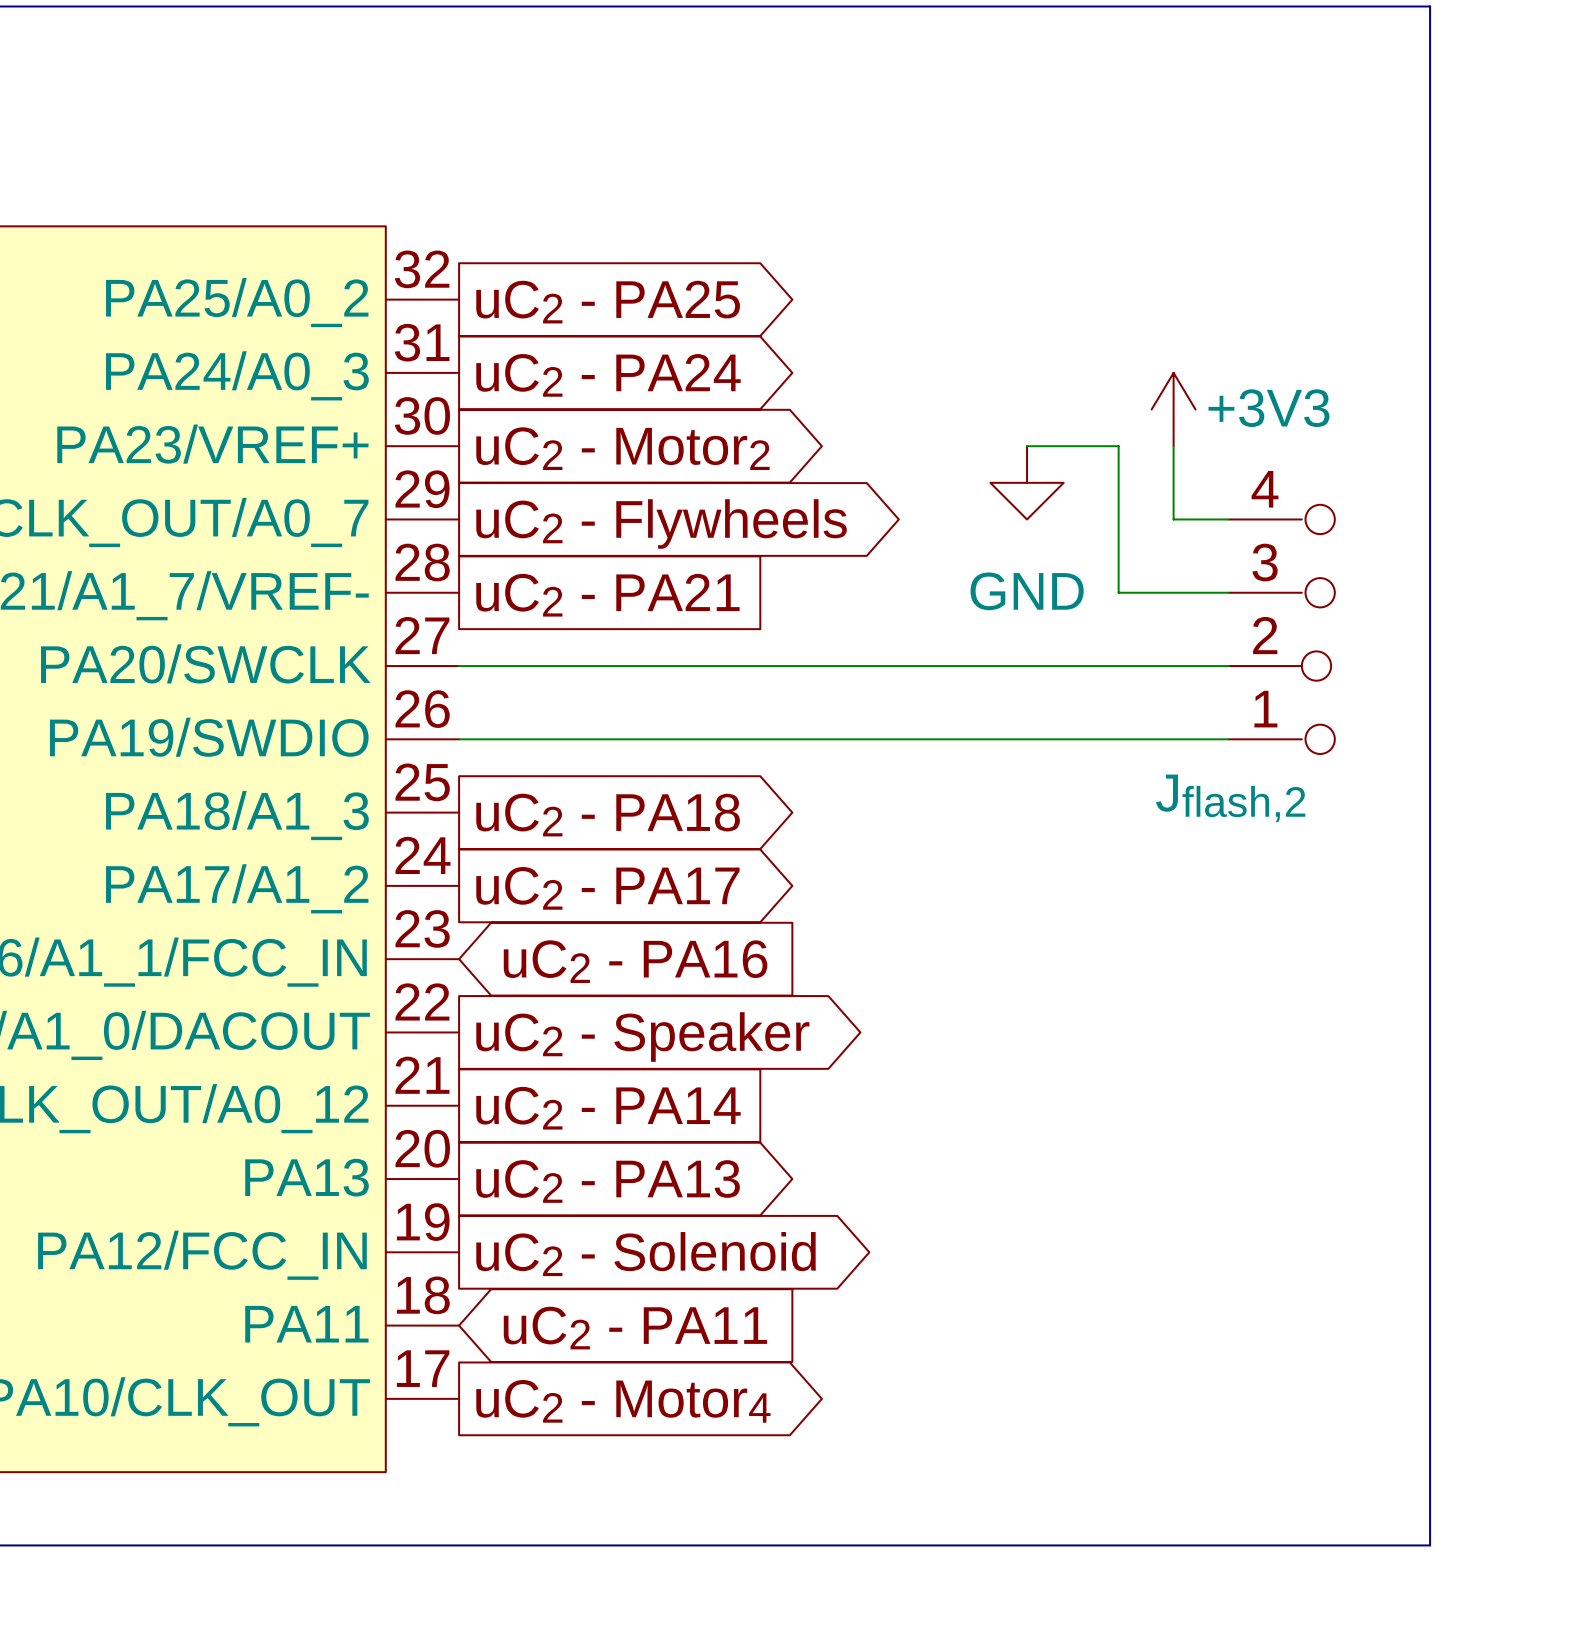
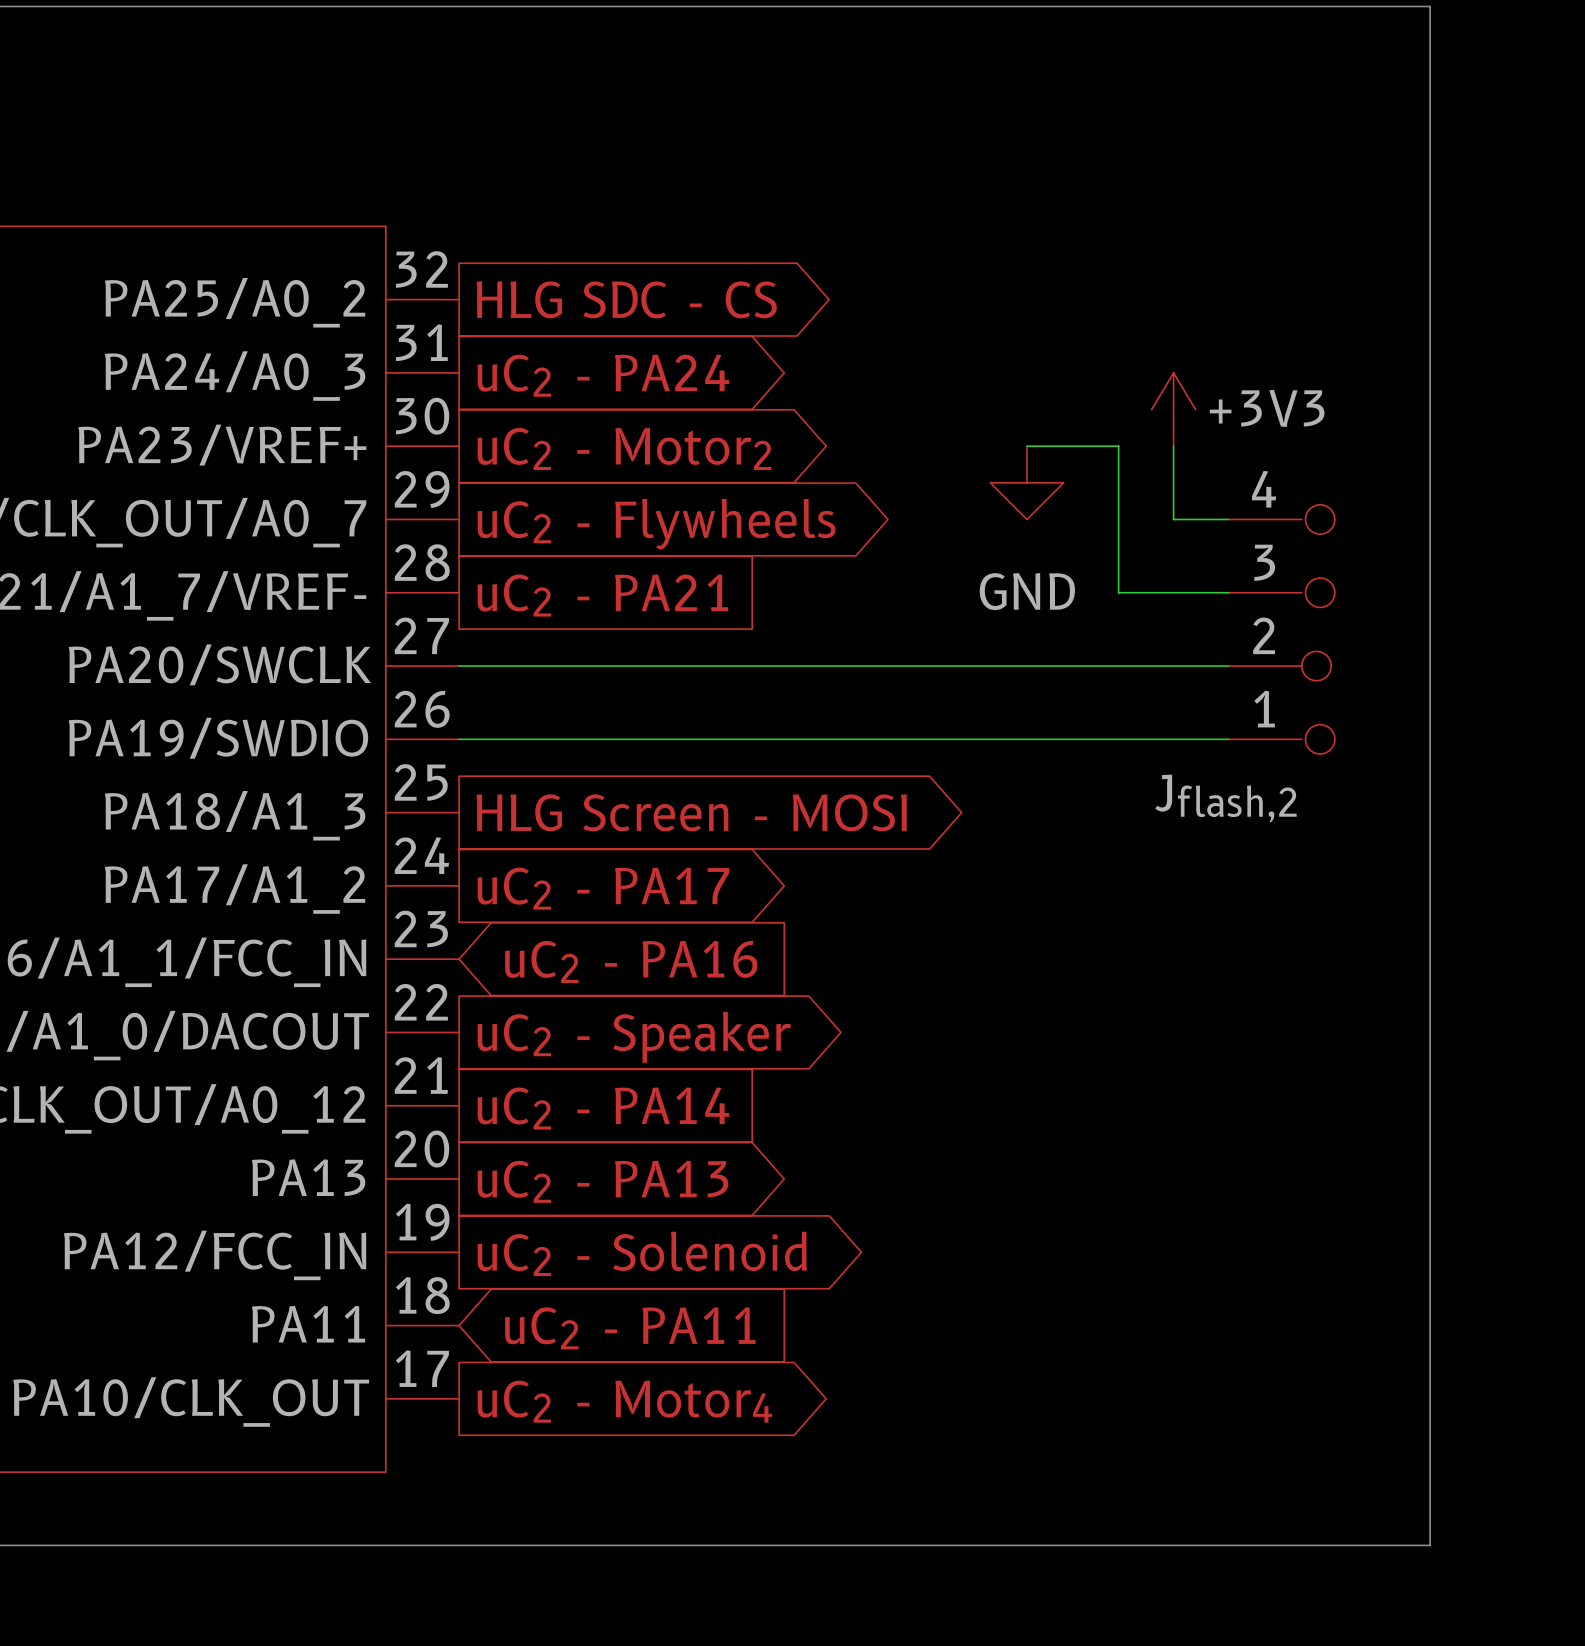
global label: uC2 - PA25 (608, 302) -> HLG SDC - CS (626, 299)
global label: uC2 - PA18 (608, 815) -> HLG Screen - MOSI (691, 812)

